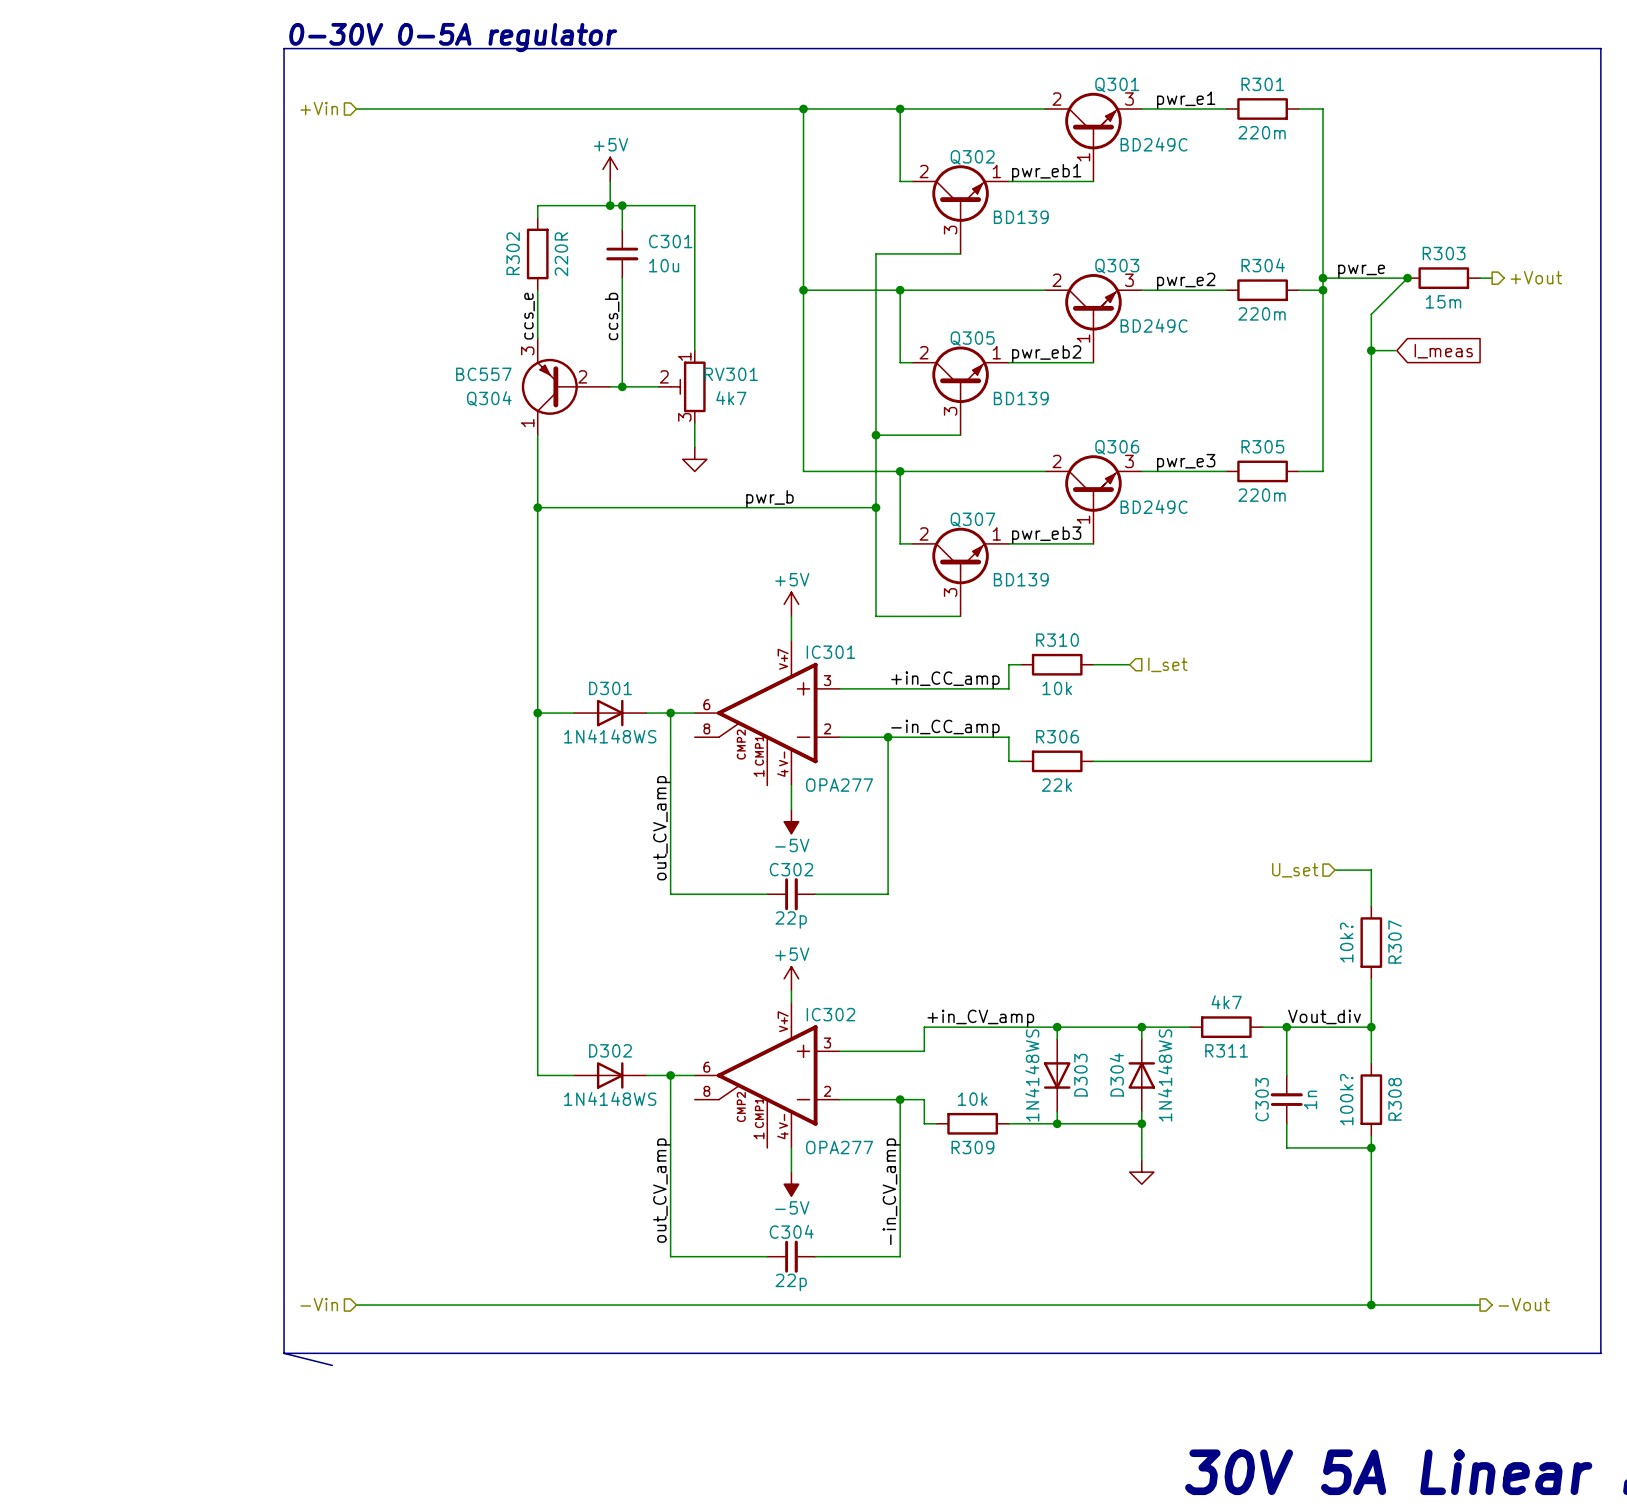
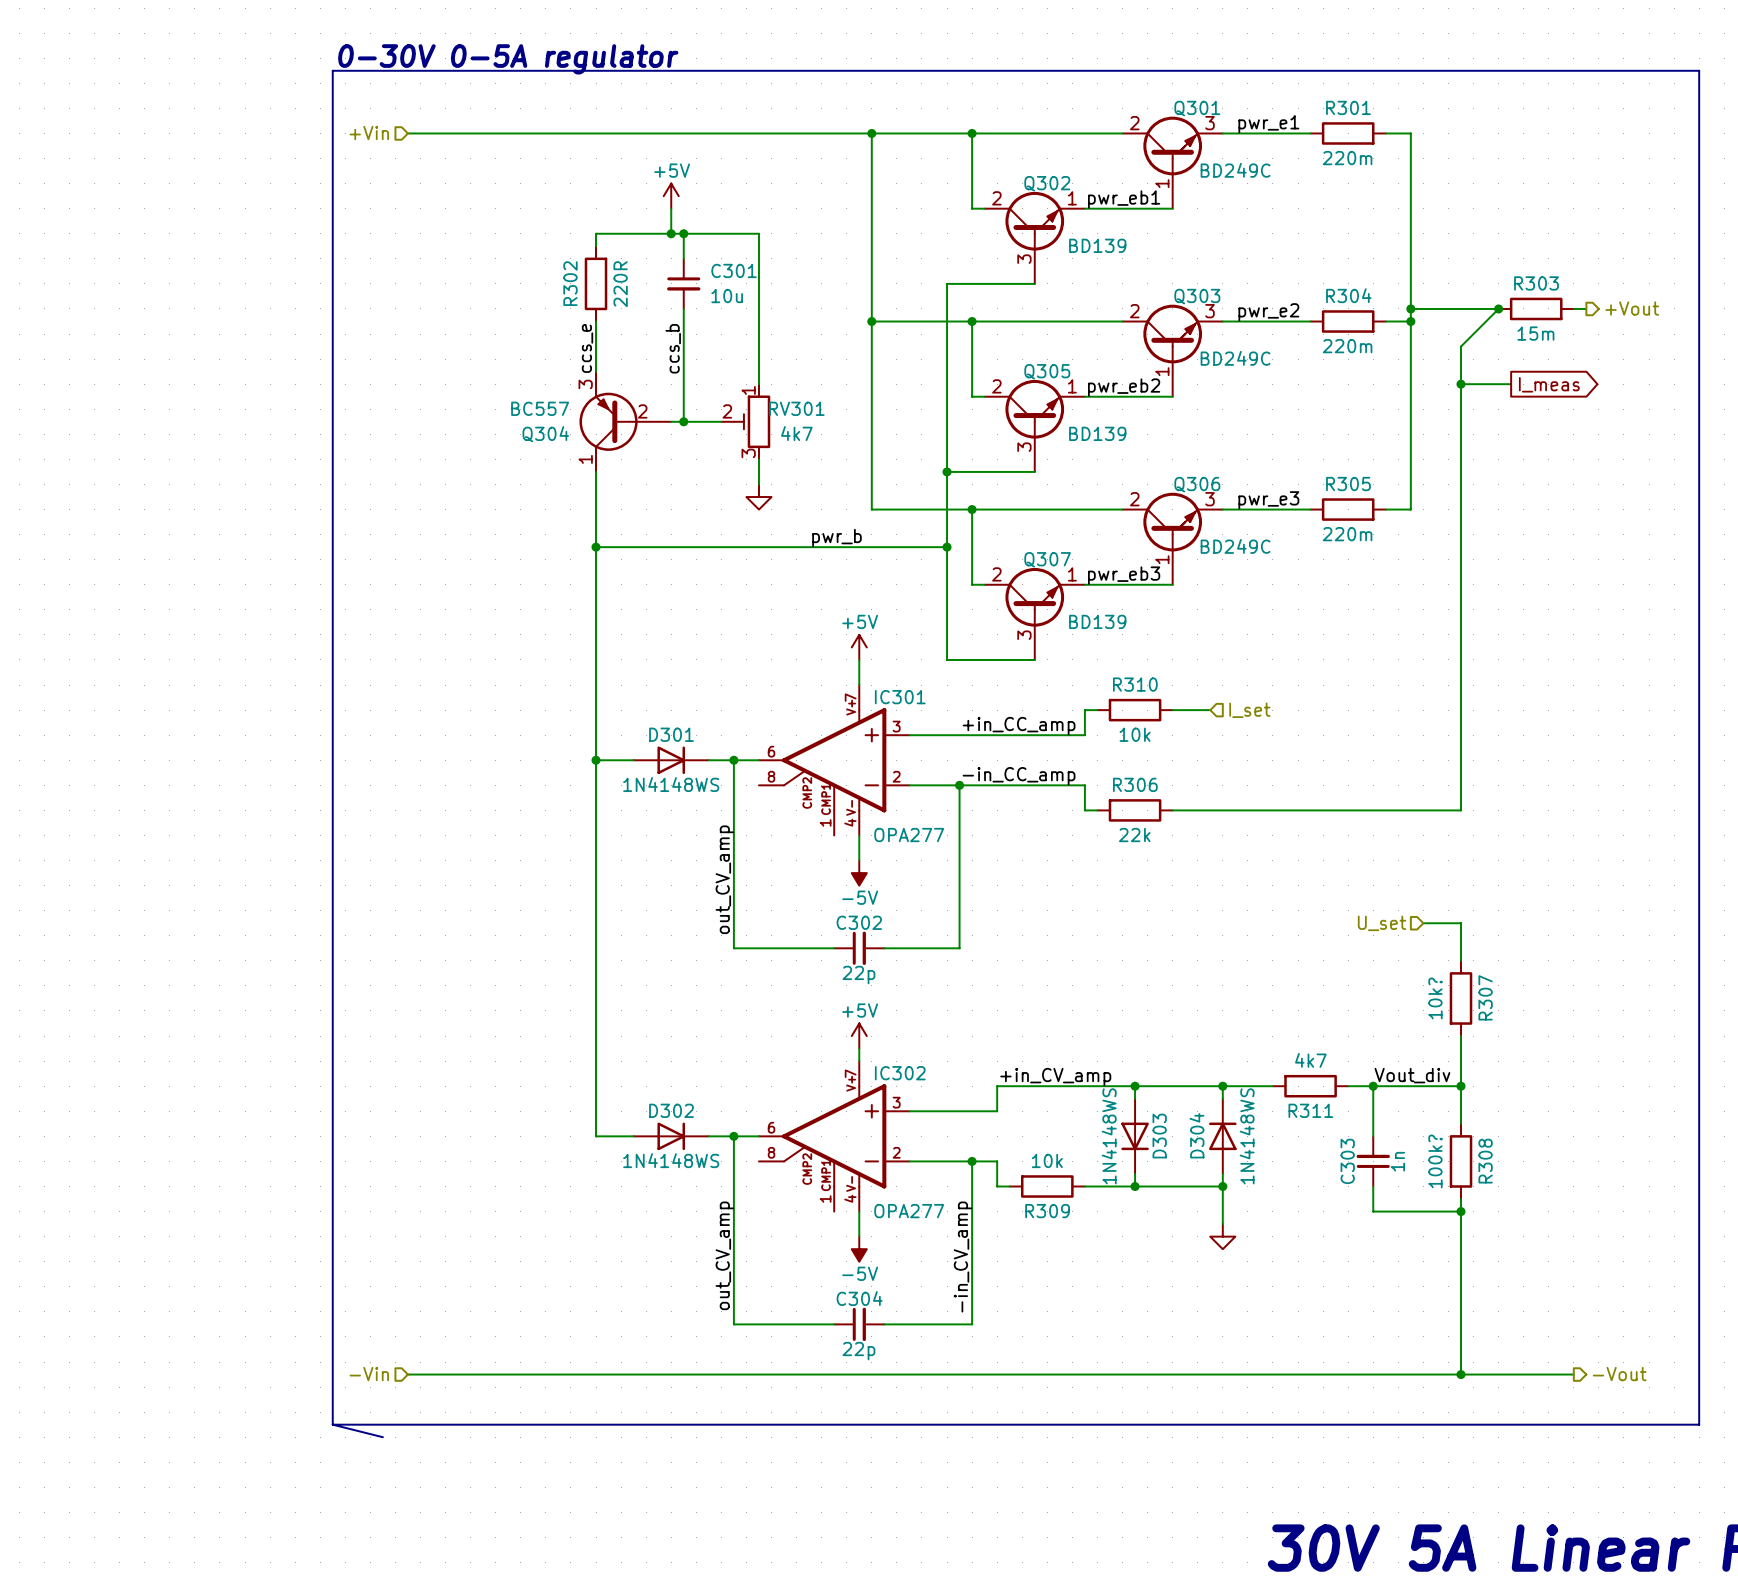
label: pwr_e (1361, 271) -> none
wire: none -> (1486, 384) (1511, 384)
global label rotation: 0° (1443, 351) -> 180° (1549, 384)

